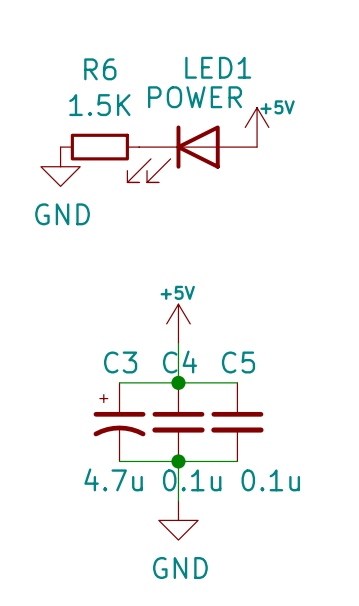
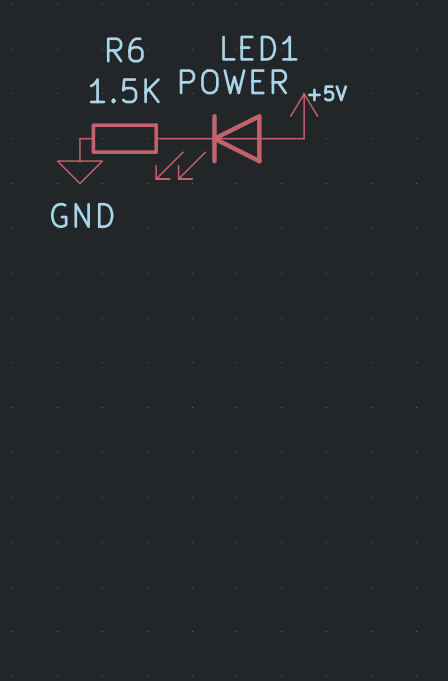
power symbol: +5V (178, 323) -> none
wire: (178, 343) (178, 382) -> none
wire: (119, 382) (237, 382) -> none
junction: (178, 382) -> none
C3: 4.7u (119, 422) -> none
C4: 0.1u (178, 422) -> none
C5: 0.1u (237, 422) -> none
wire: (119, 461) (237, 461) -> none
wire: (178, 461) (178, 500) -> none
junction: (178, 461) -> none
power symbol: GND (178, 520) -> none

